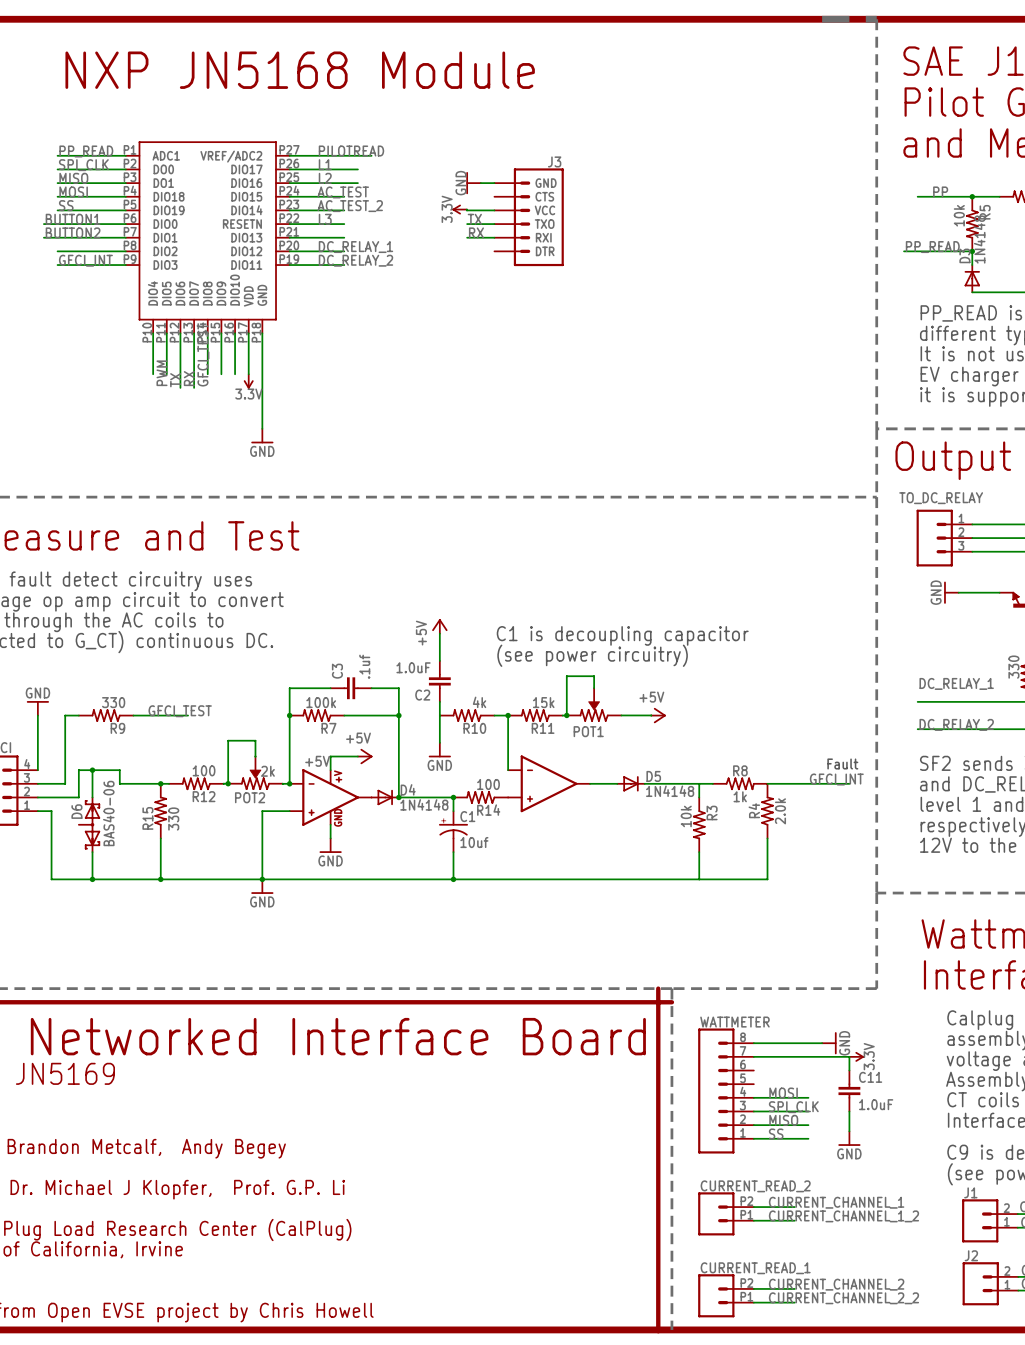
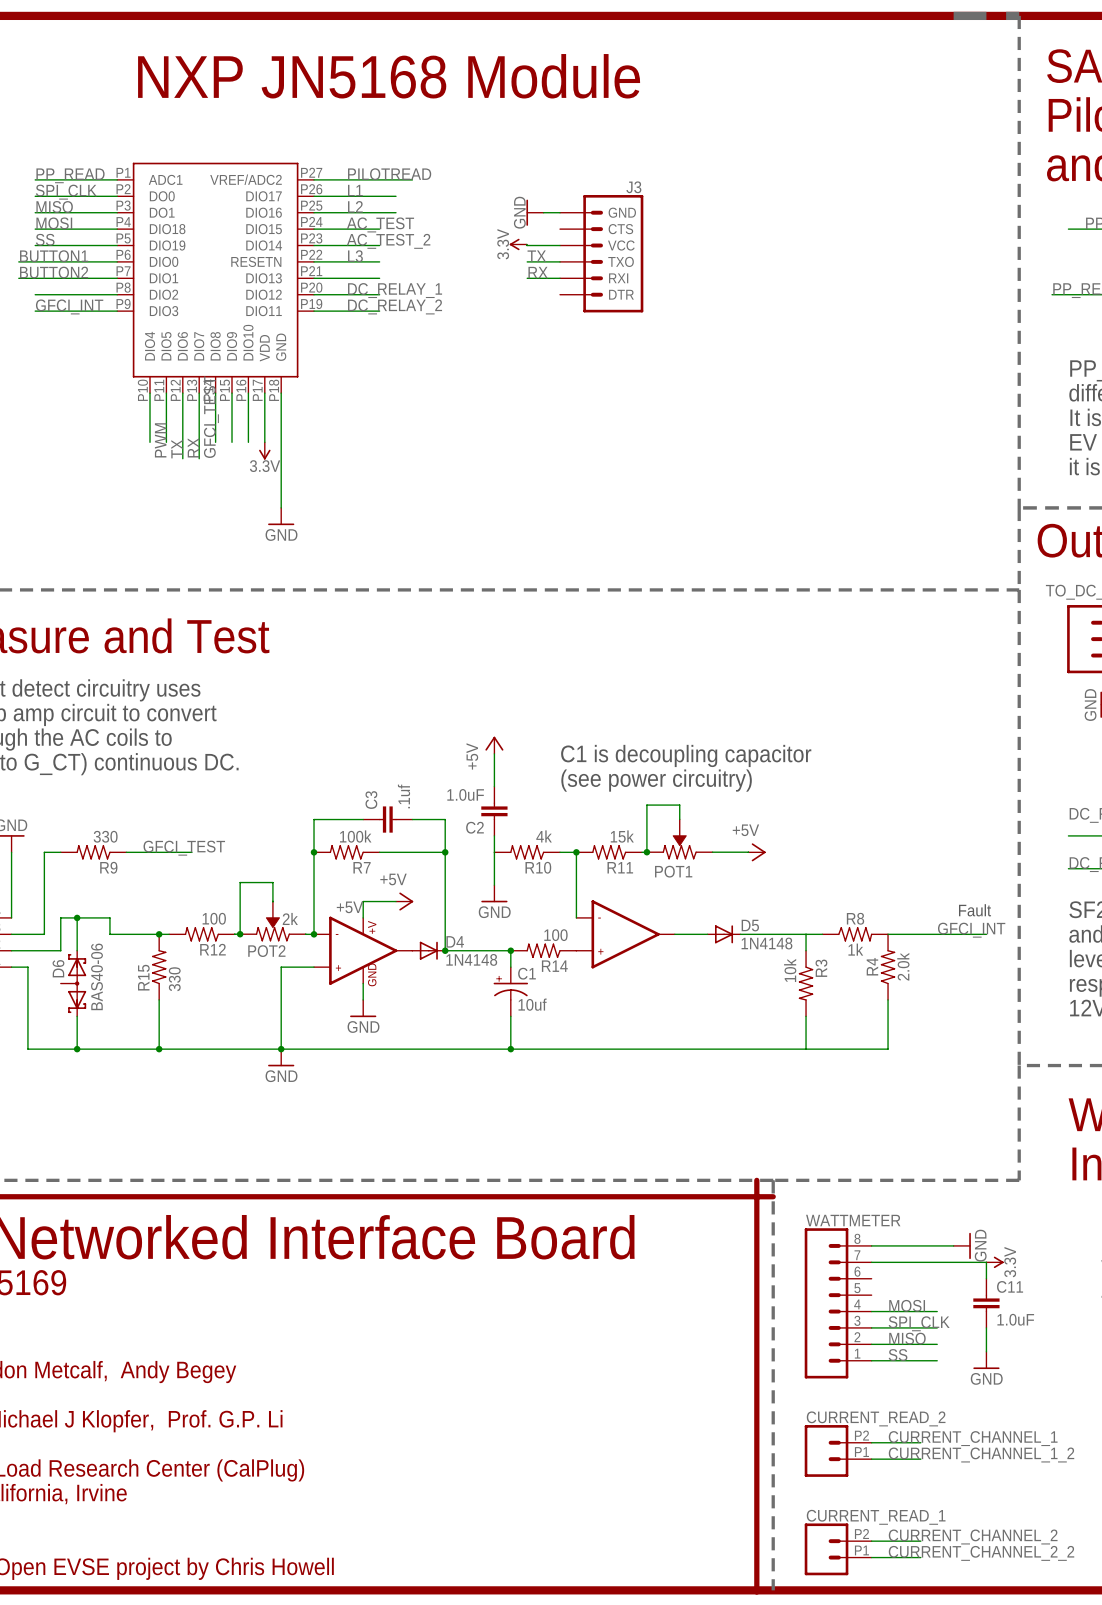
text position: NXP JN5168 Module (300, 70) -> NXP JN5168 Module (389, 76)

